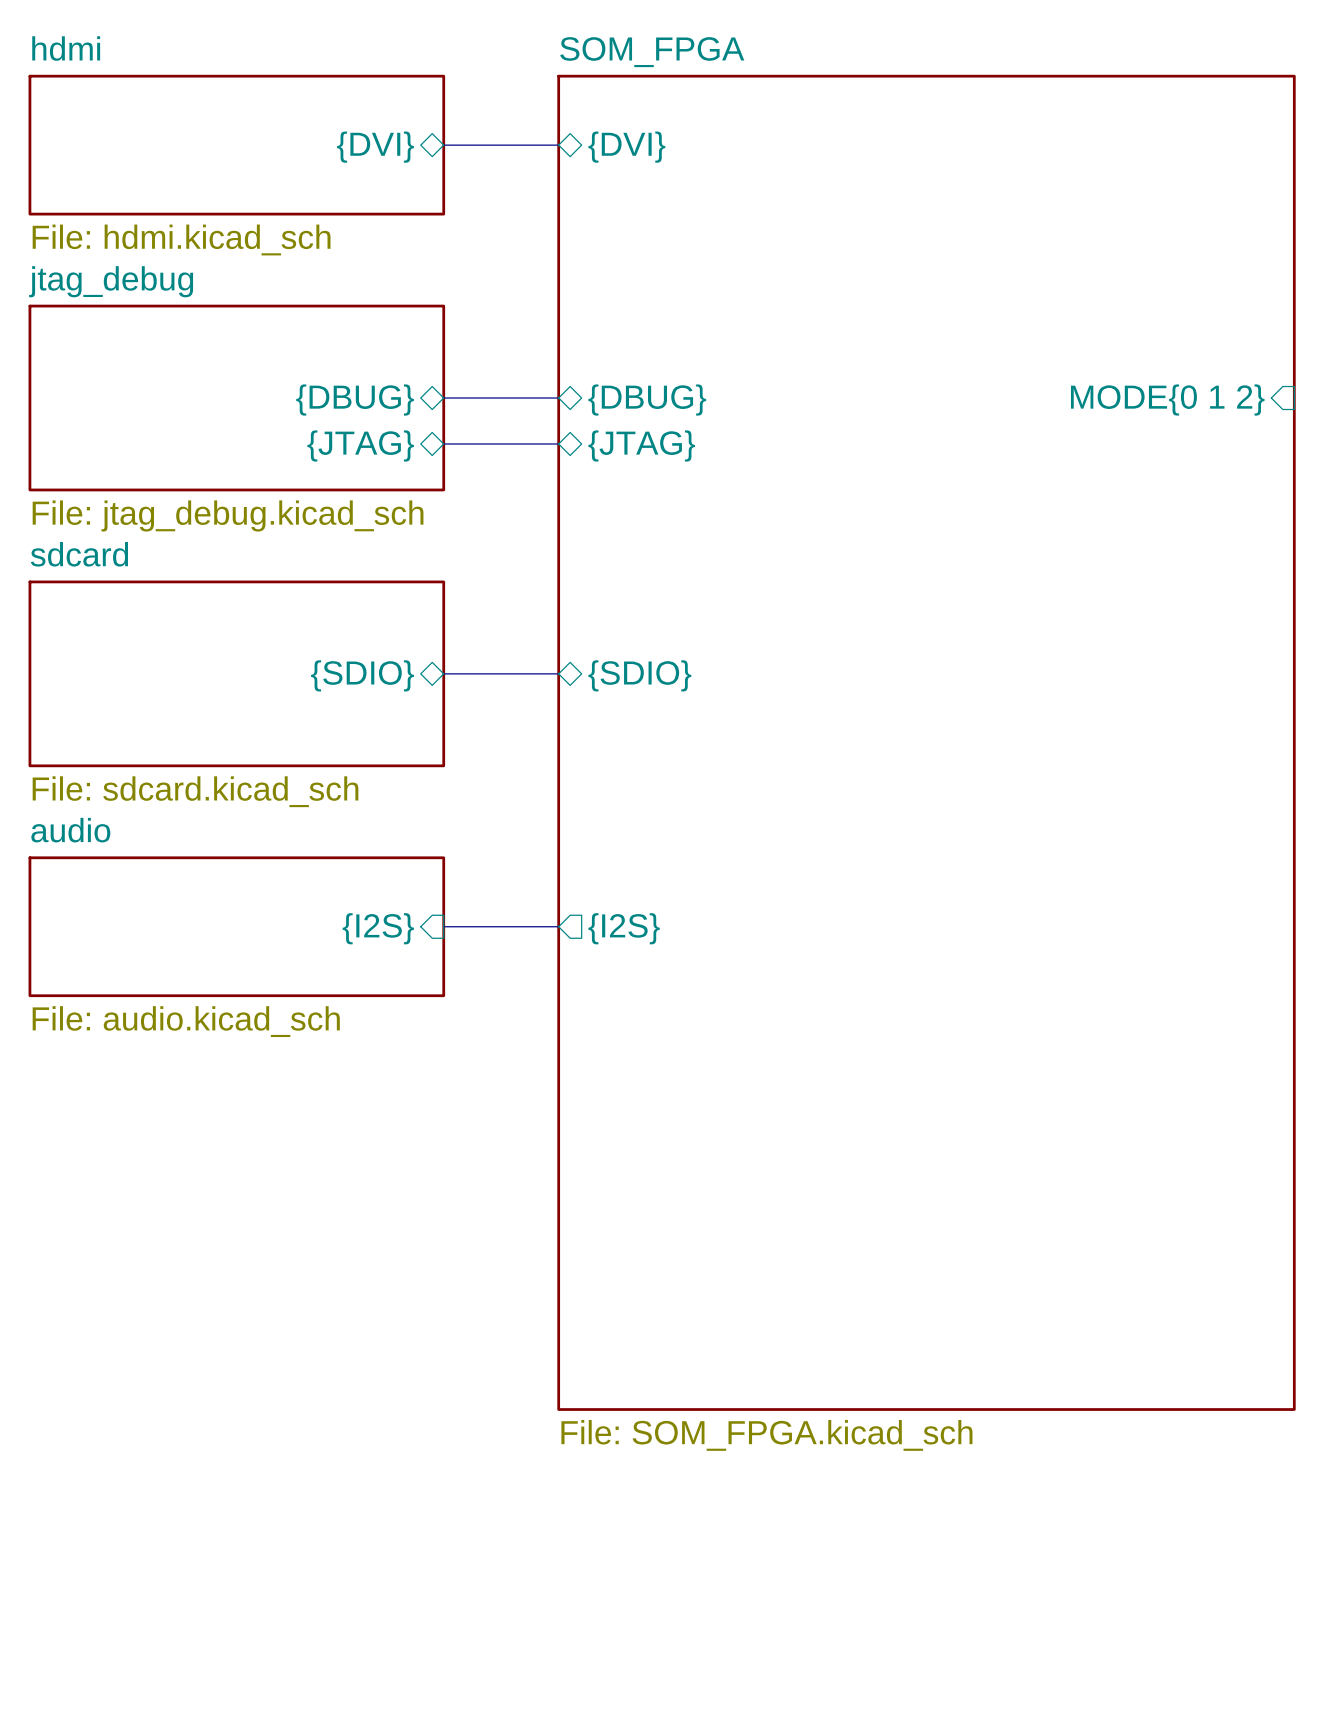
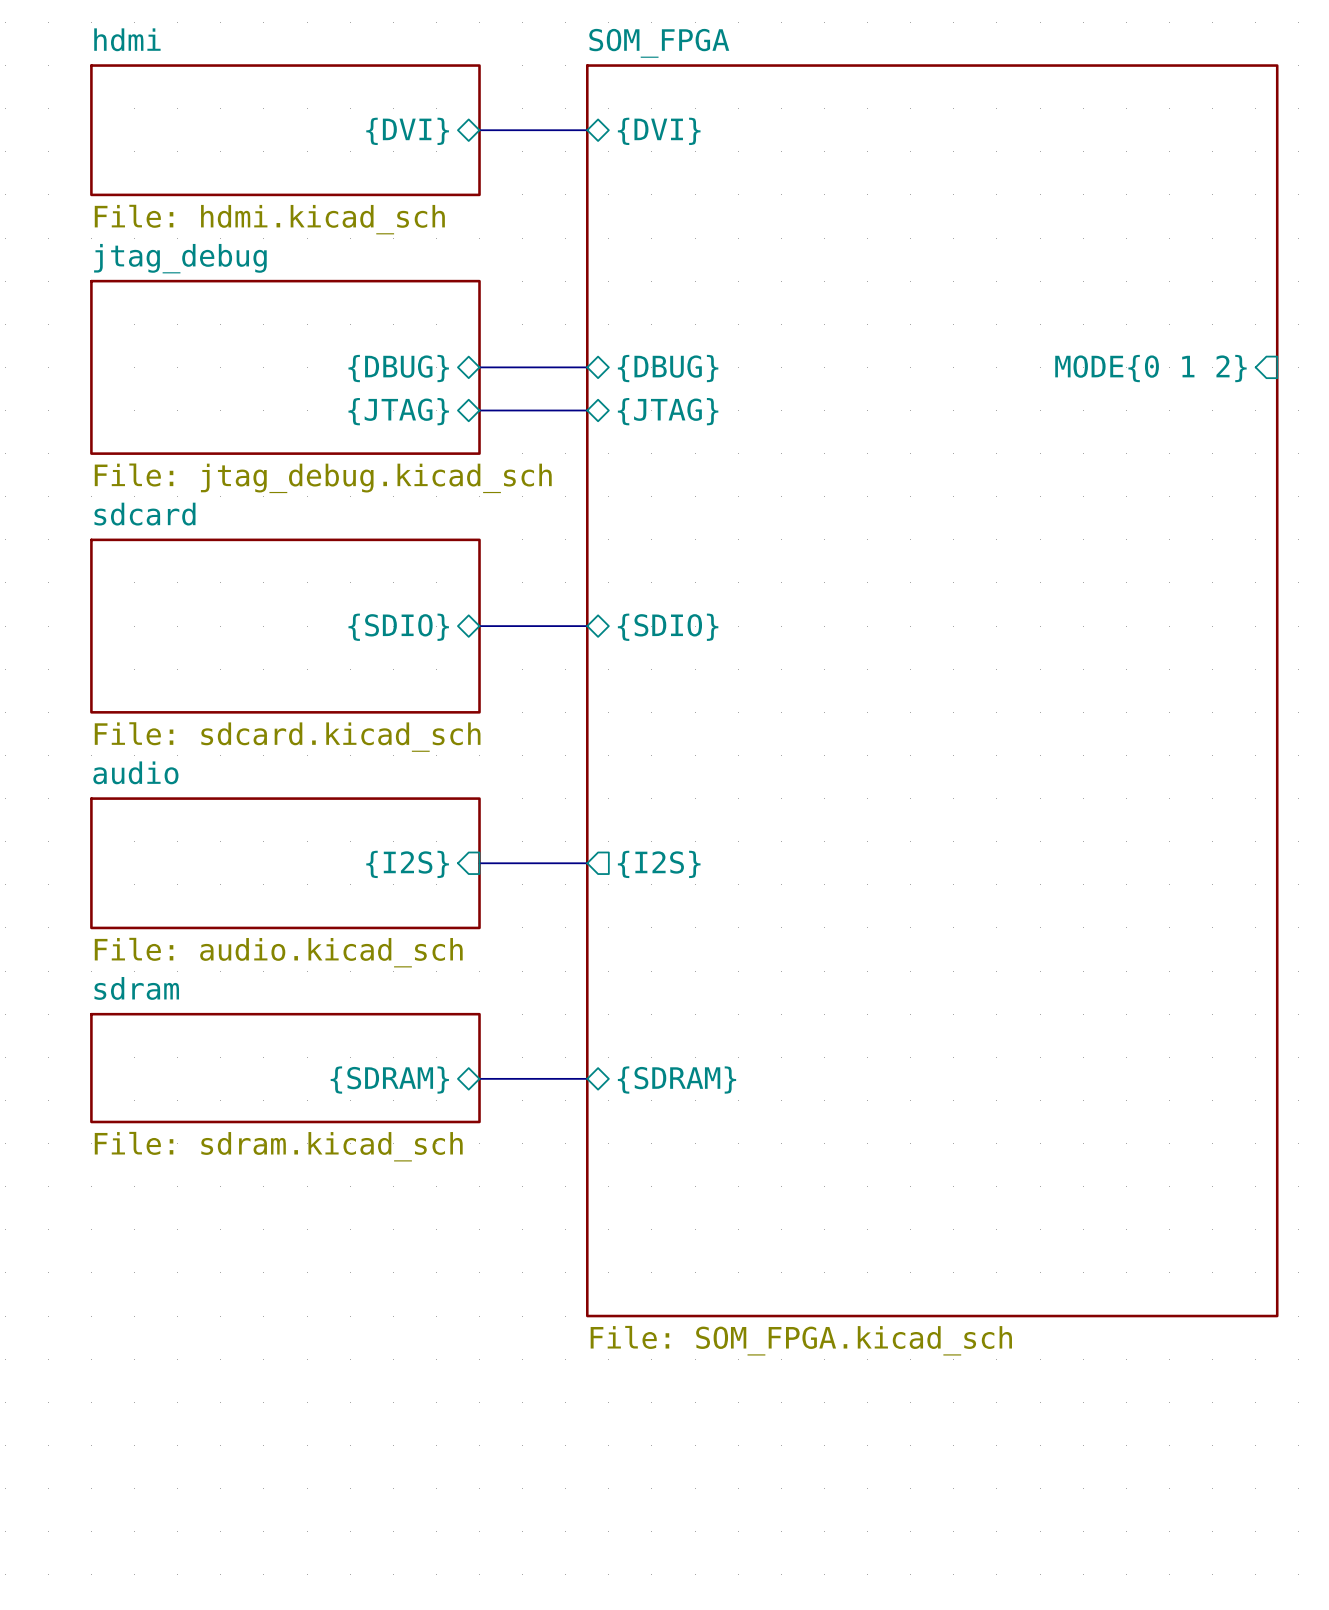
sheet sdram: none -> File: sdram.kicad_sch (285, 1068)
bus: none -> (479, 1078) (587, 1078)
sheet pin: none -> {SDRAM} (389, 1080)
sheet pin: none -> {SDRAM} (677, 1080)

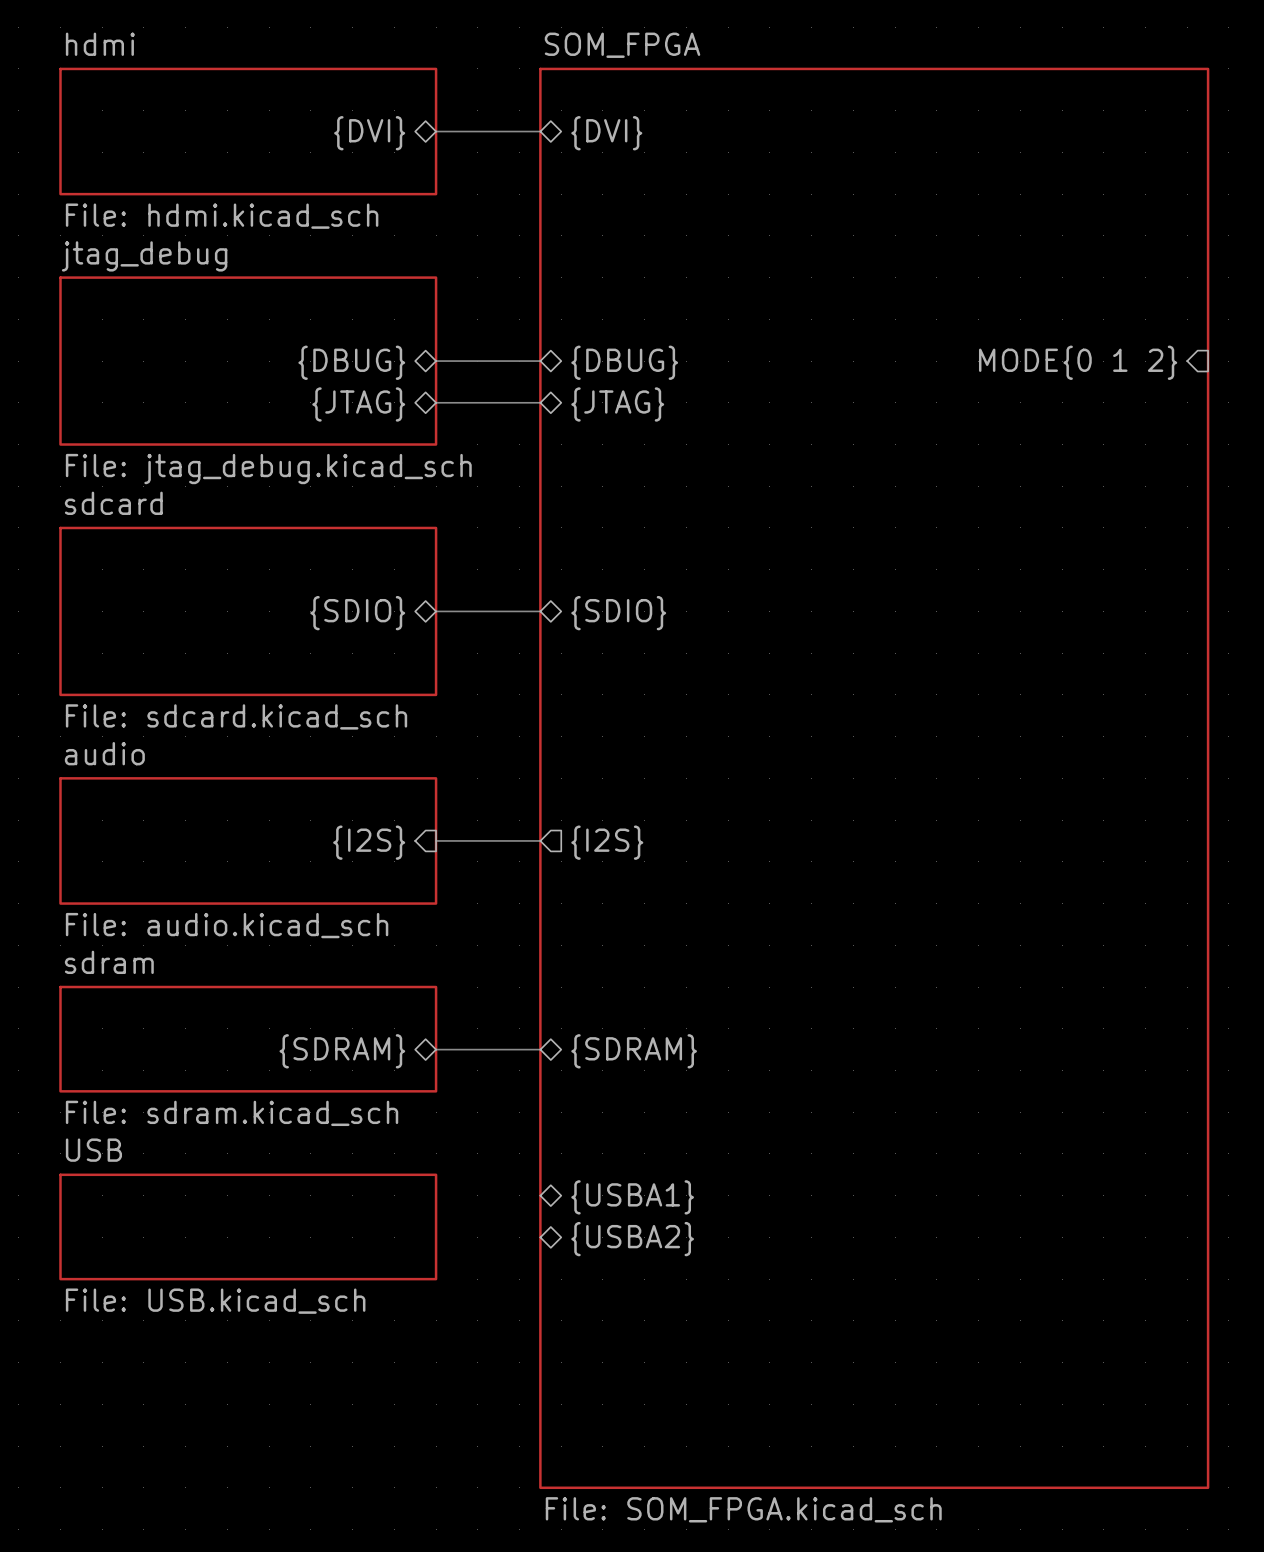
sheet SOM_FPGA: File: SOM_FPGA.kicad_sch (932, 690) -> none
sheet SOM_FPGA: none -> File: SOM_FPGA.kicad_sch (874, 778)
sheet pin: none -> {USBA1} (632, 1197)
sheet USB: none -> File: USB.kicad_sch (248, 1226)
sheet pin: none -> {USBA2} (632, 1239)

